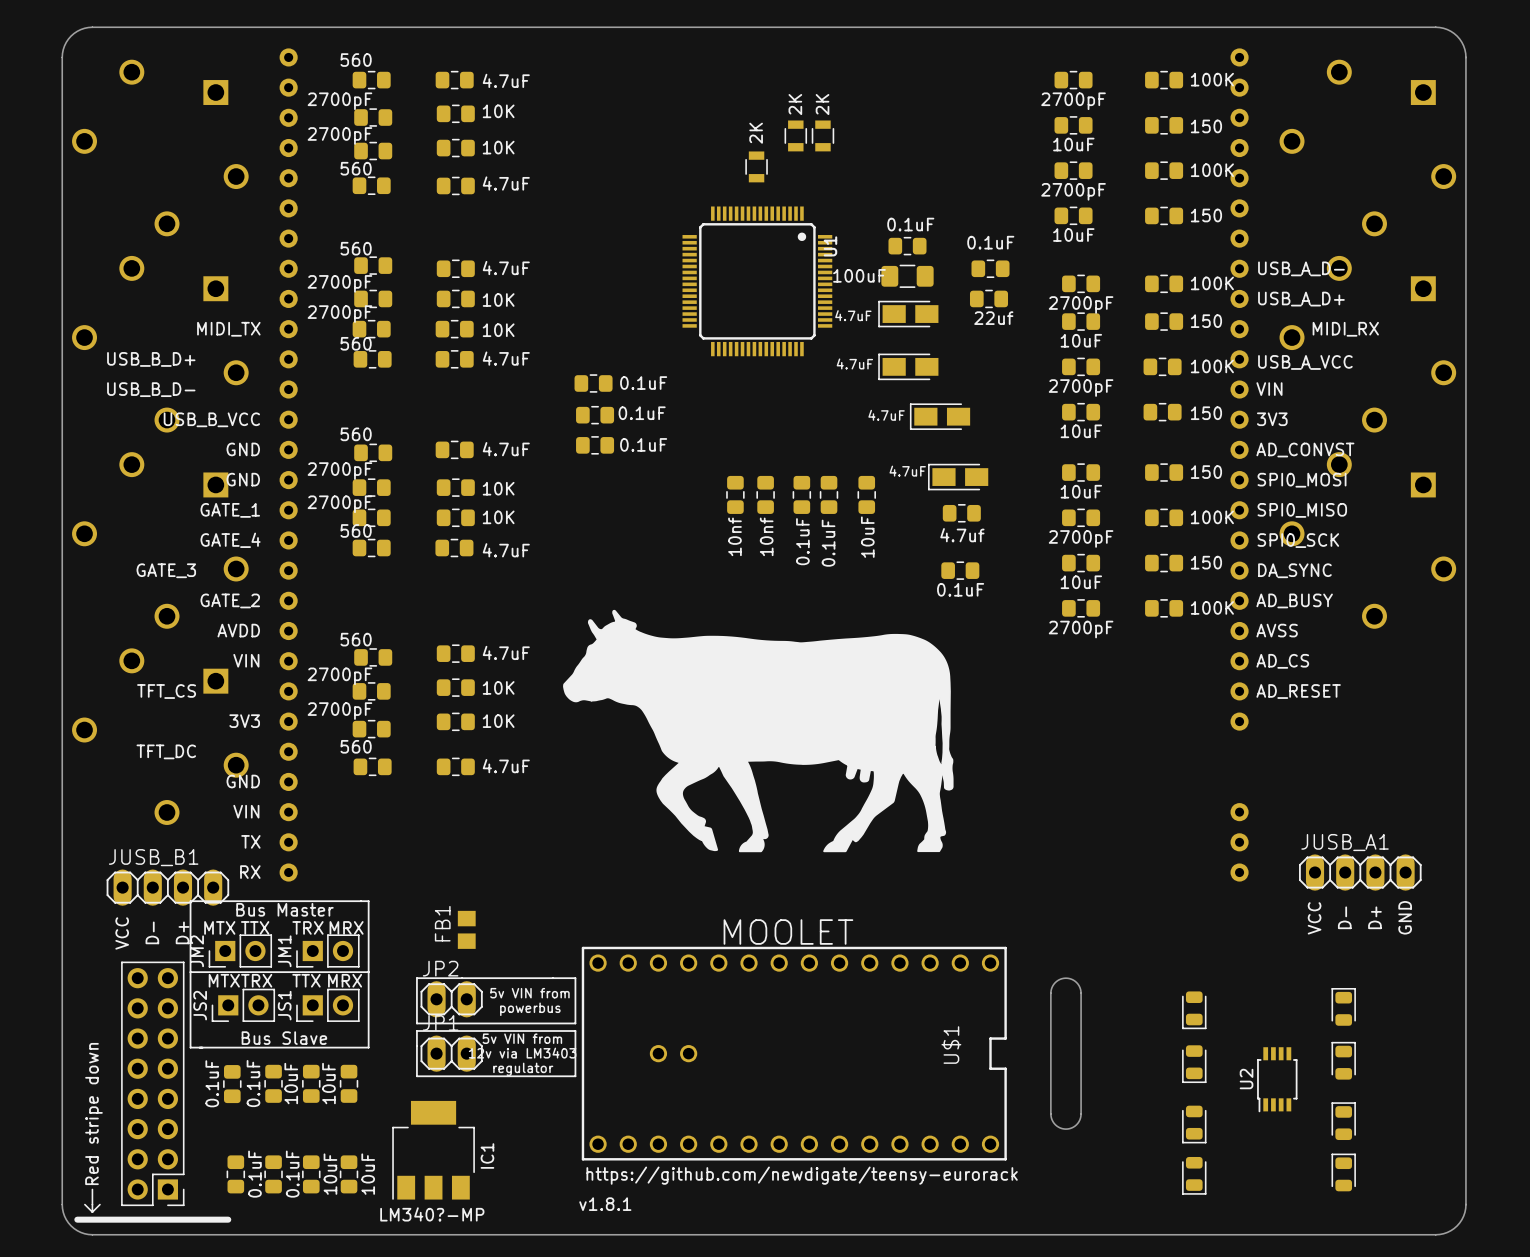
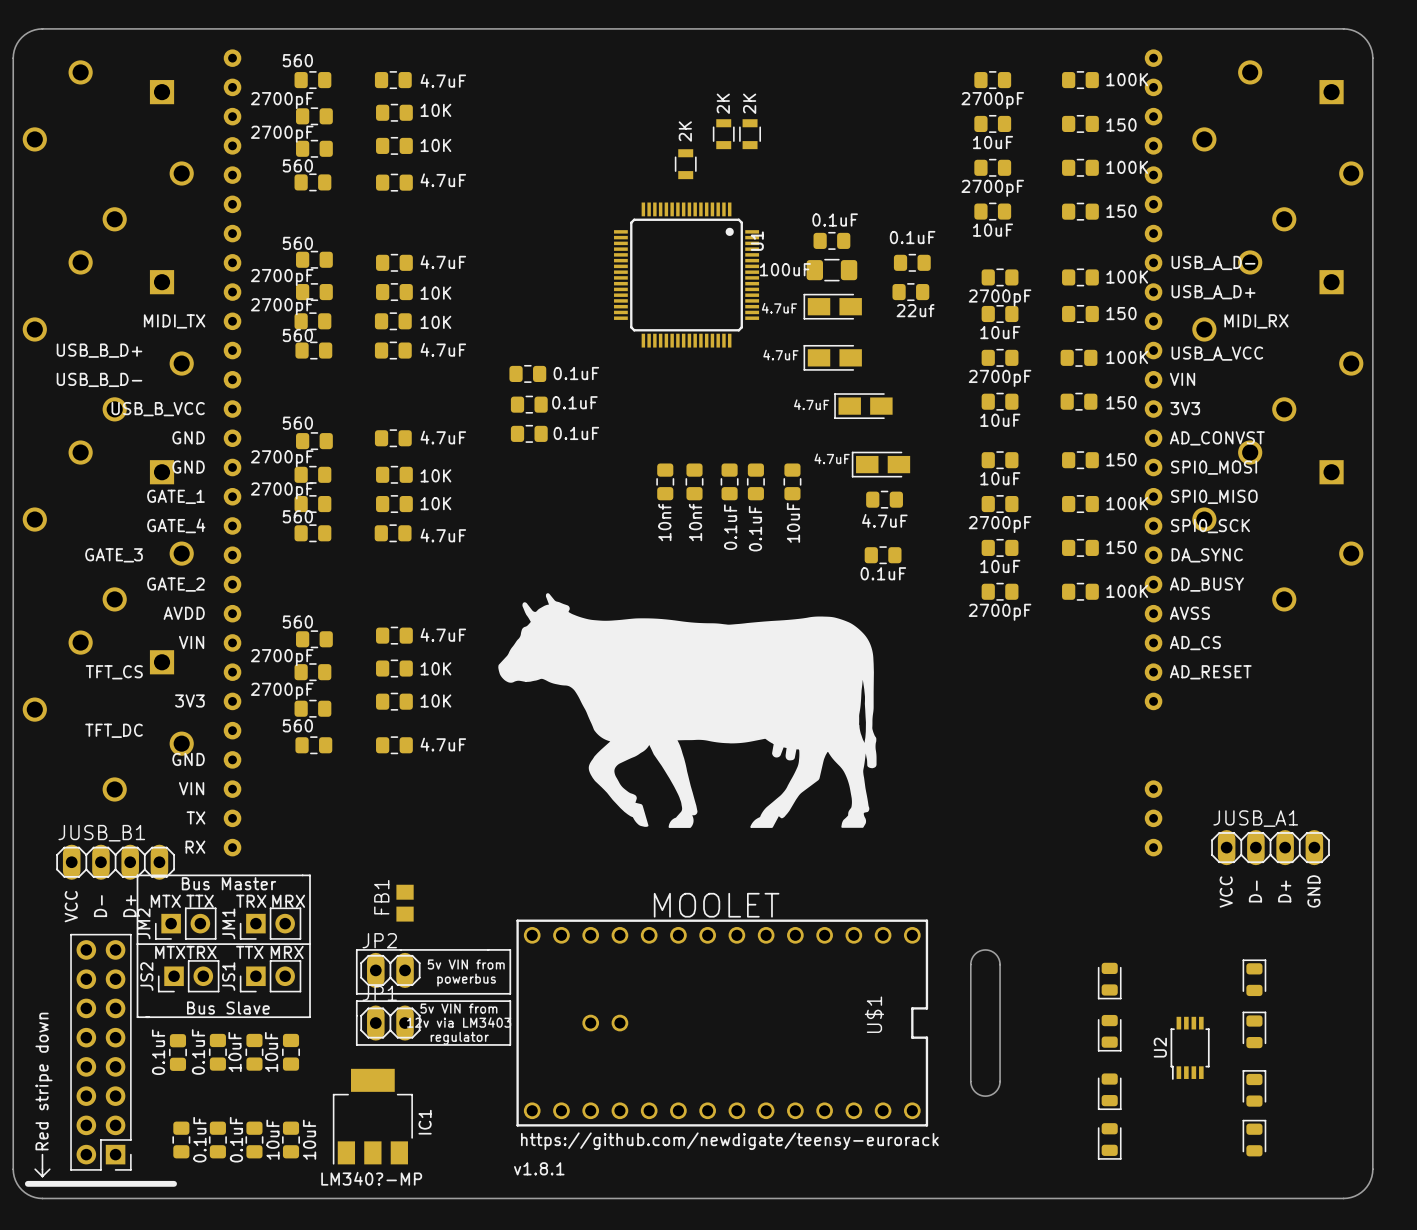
part value: 4.7uf (962, 535) -> 4.7uF (884, 520)

